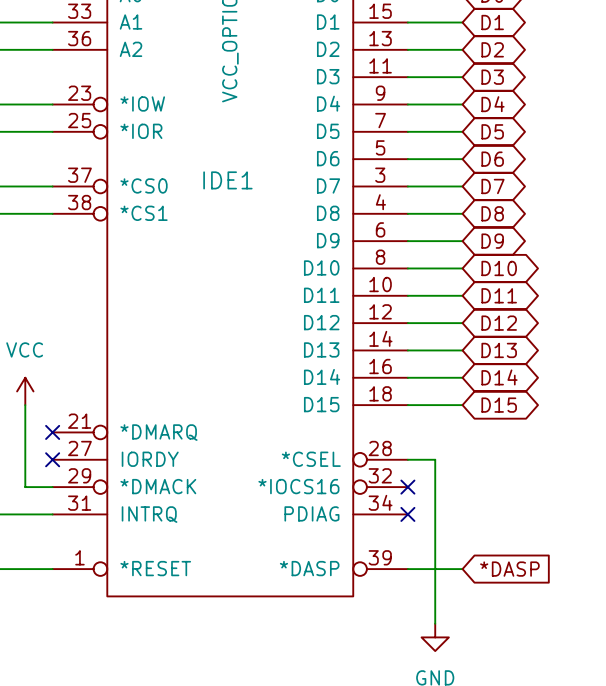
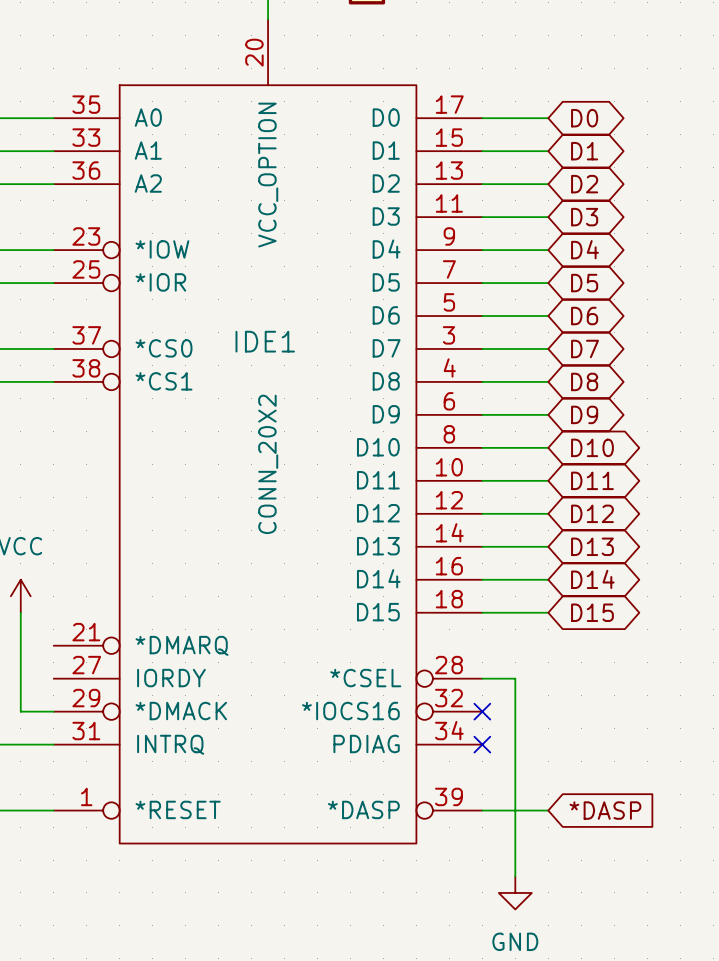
IDE1 value: none -> CONN_20X2 (268, 464)
no-connect mark: (52, 432) -> none
no-connect mark: (52, 459) -> none

